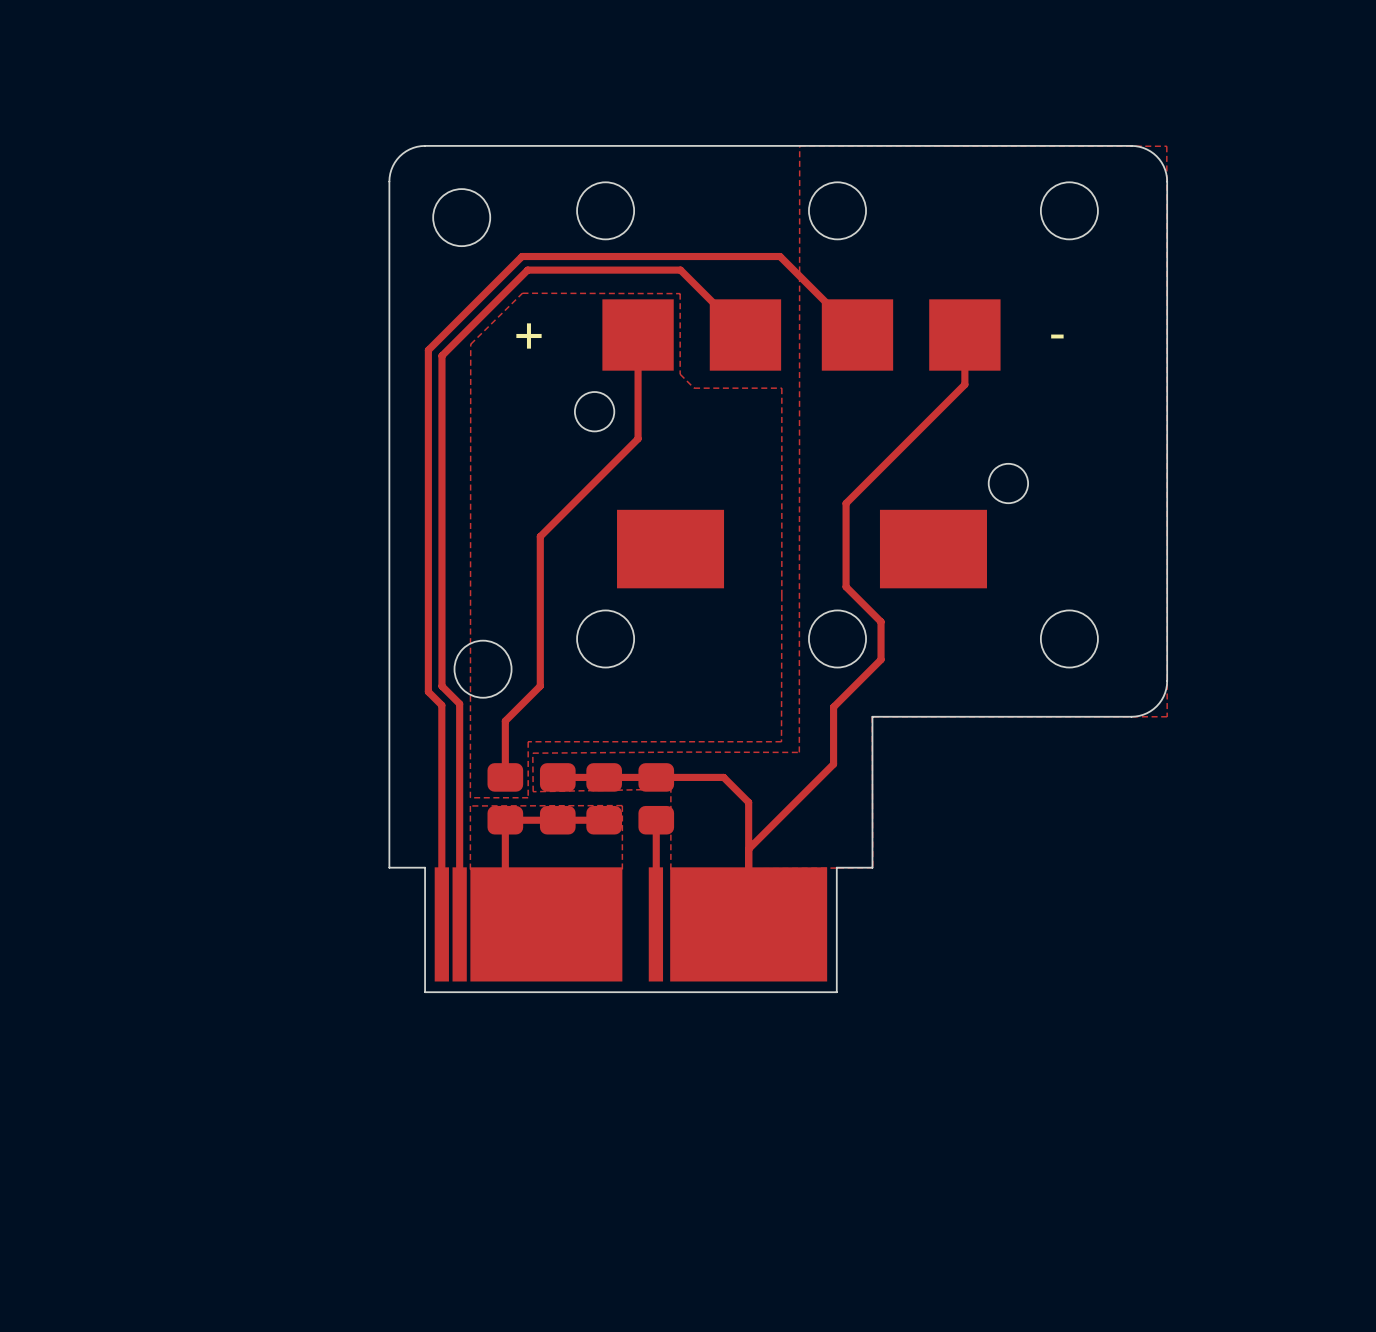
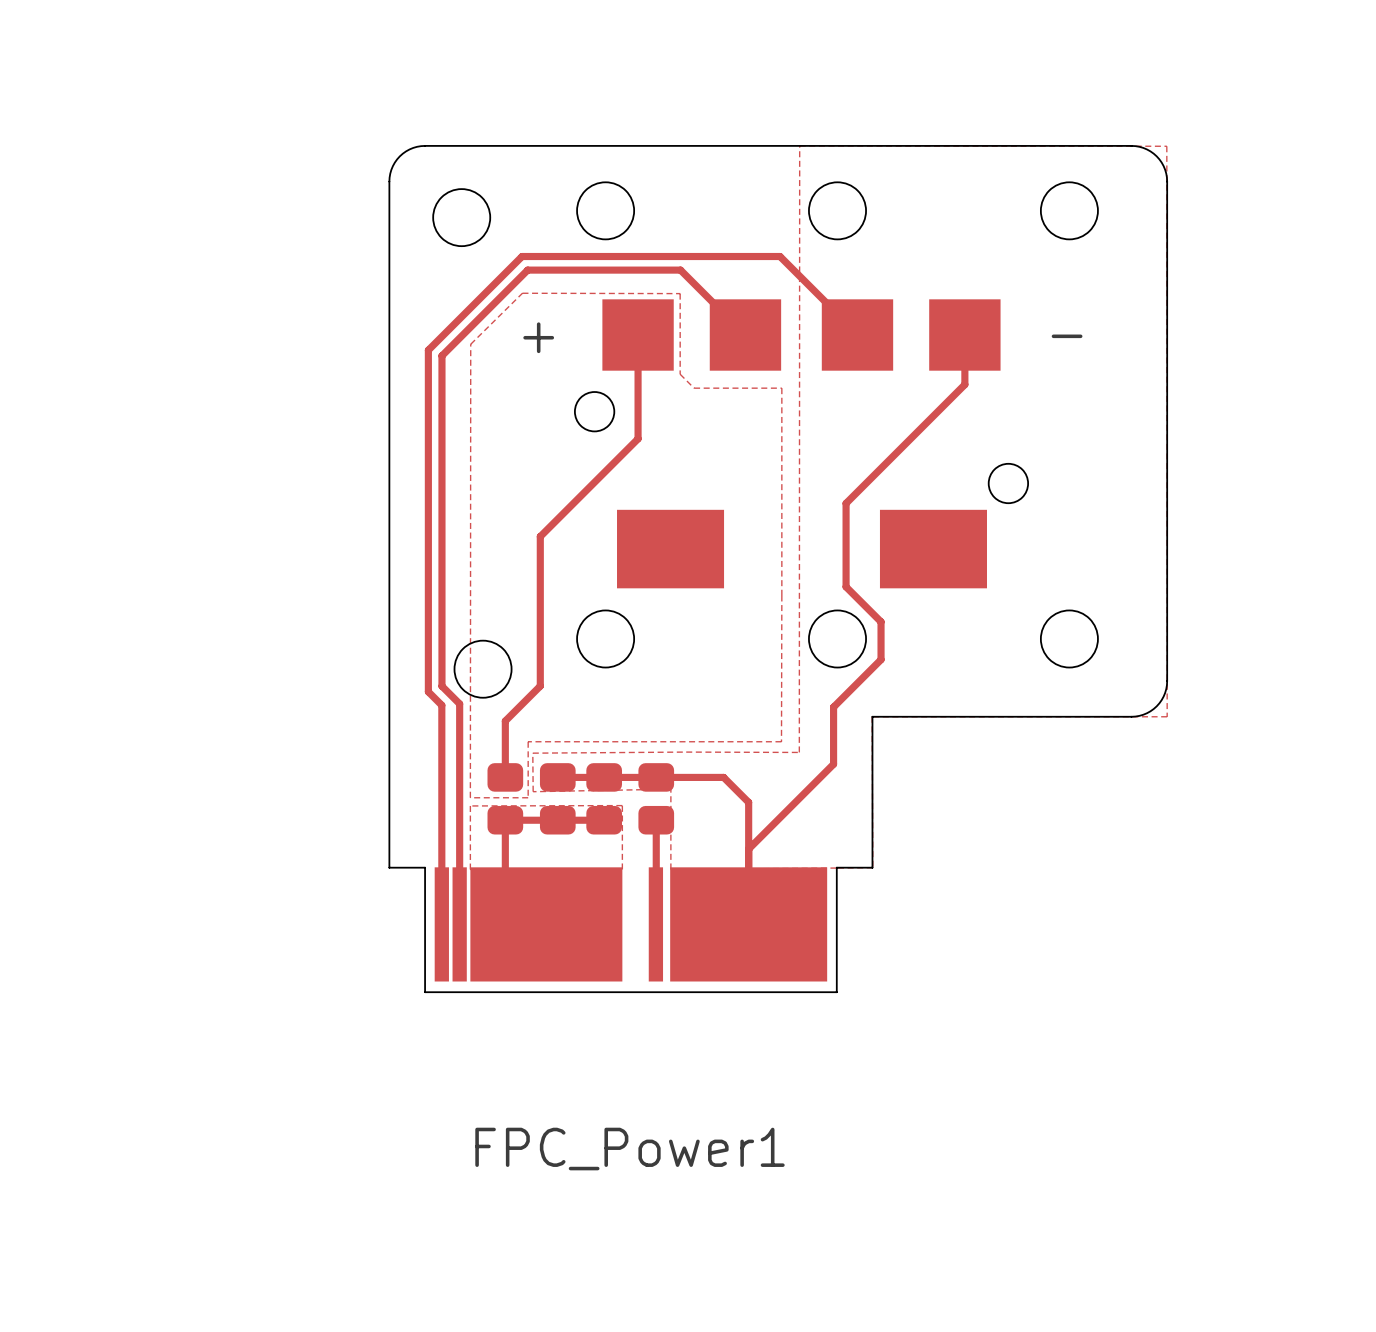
FPC_Power1 name: none -> FPC_Power1 (629, 1149)

